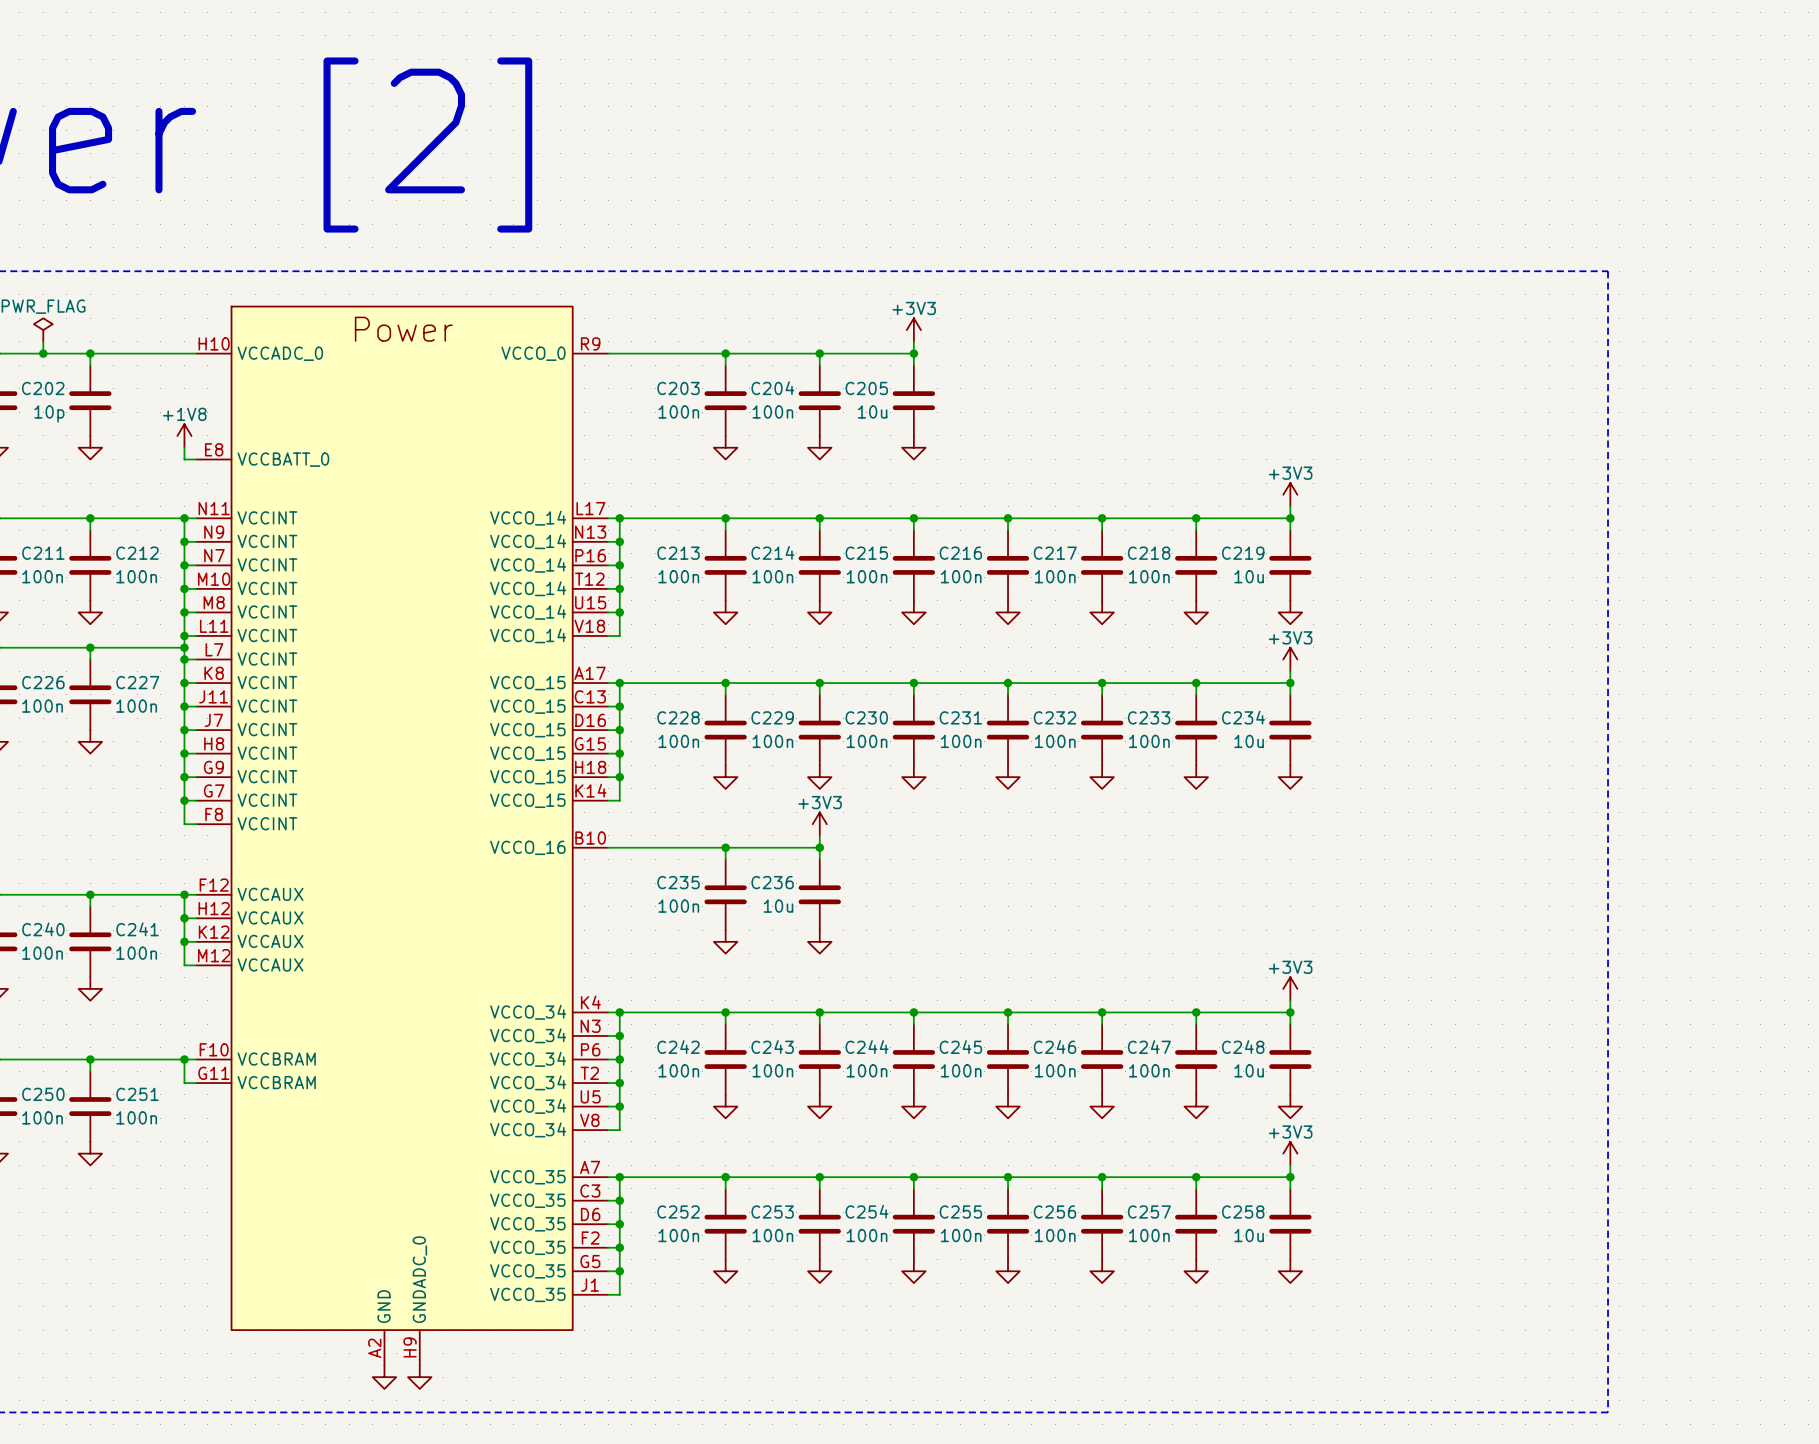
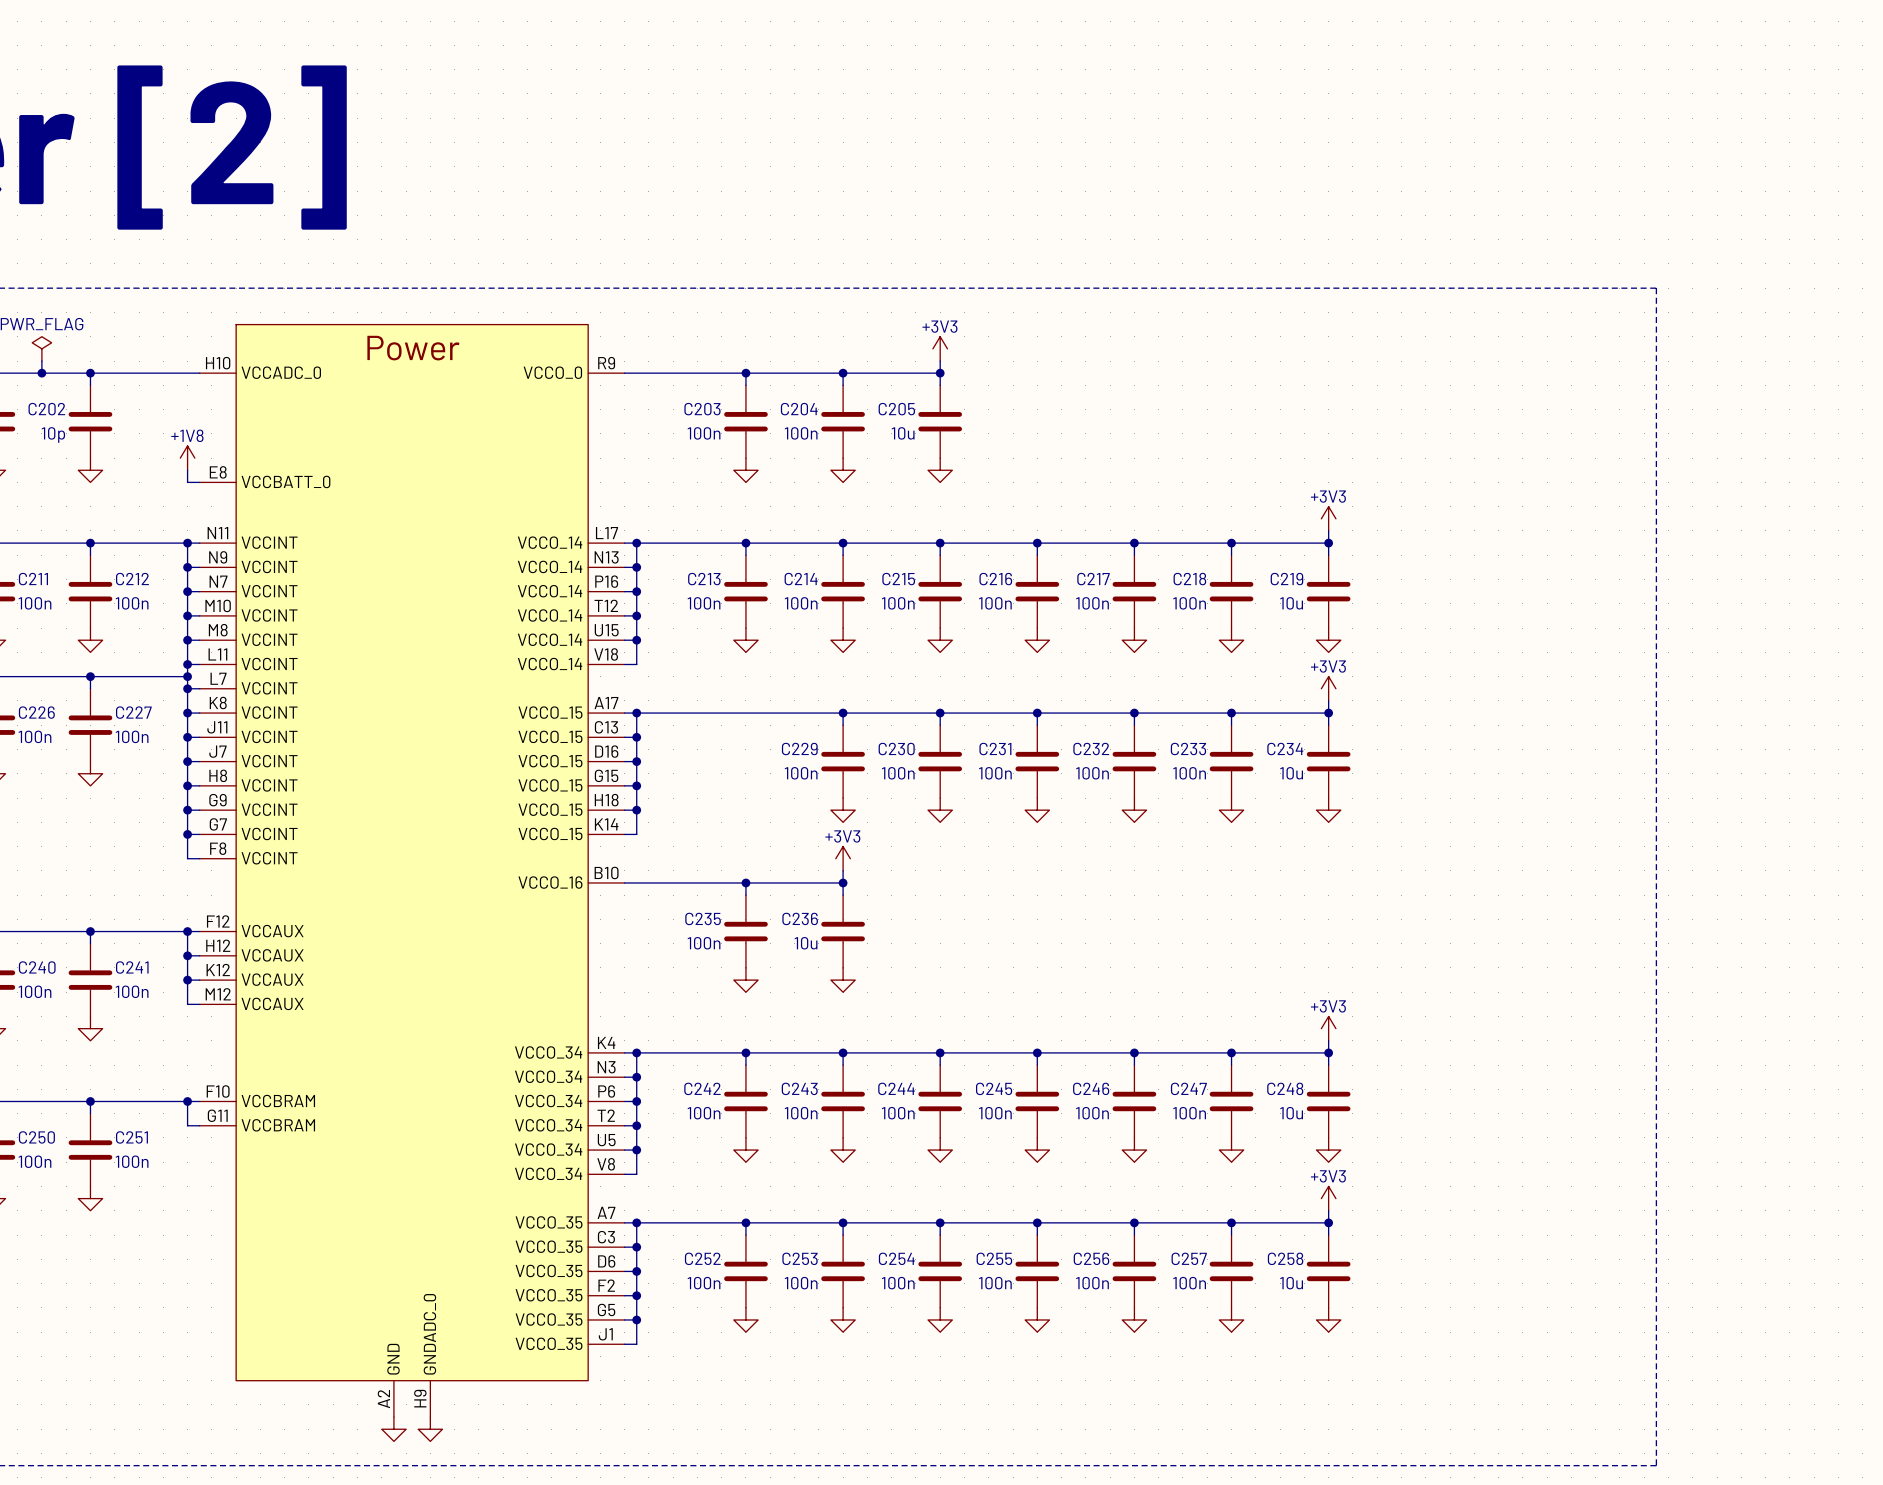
wire: (725, 683) (725, 694) -> none
junction: (725, 683) -> none
C228: 100n (725, 730) -> none
power symbol: (725, 777) -> none

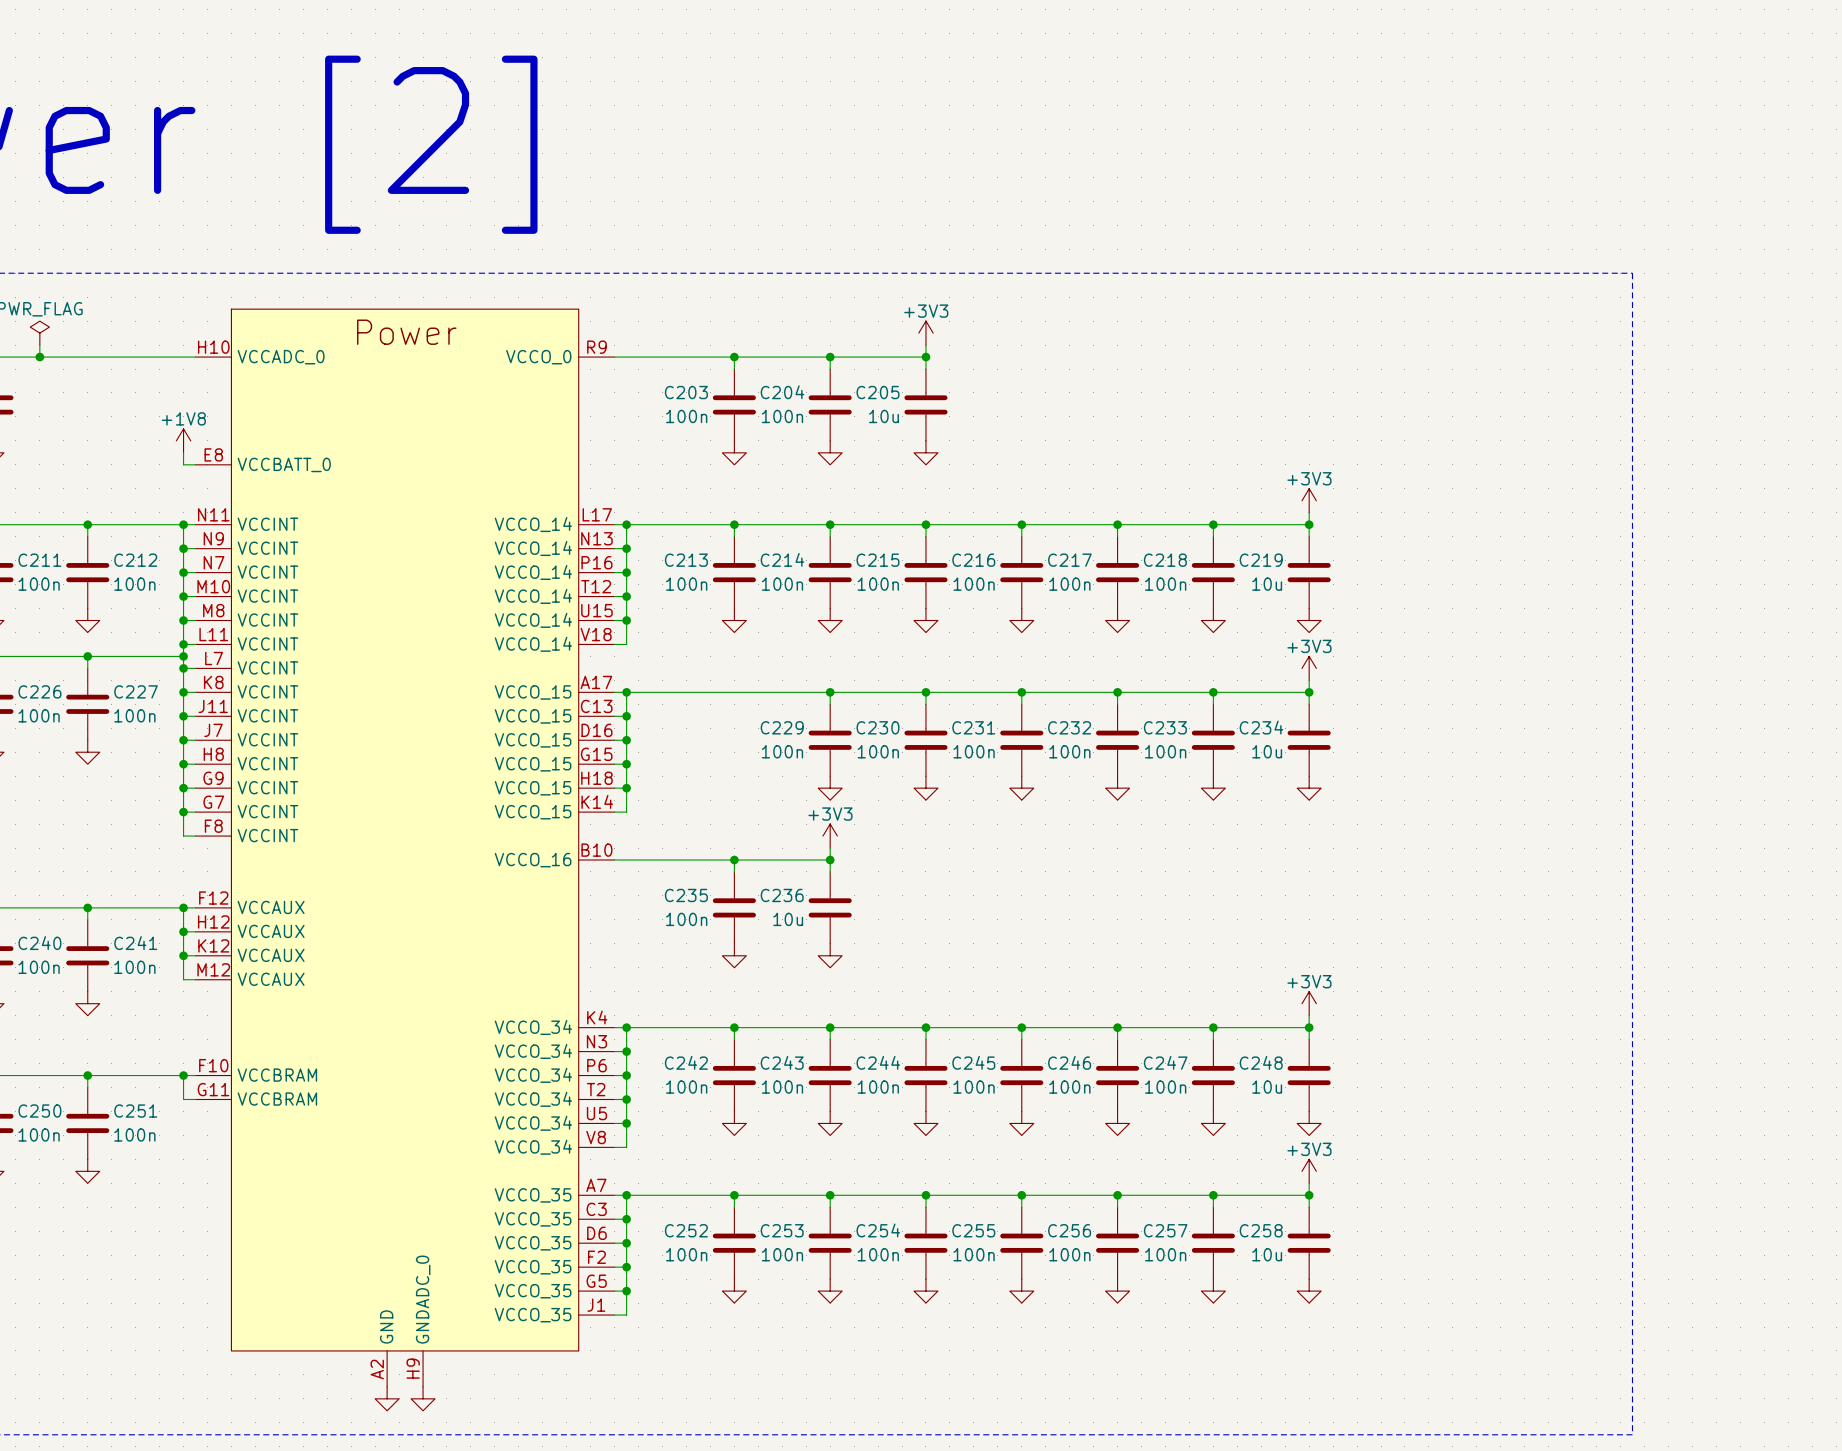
wire: (90, 373) (90, 385) -> none
junction: (90, 373) -> none
C202: 10p (90, 421) -> none
power symbol: (90, 470) -> none

